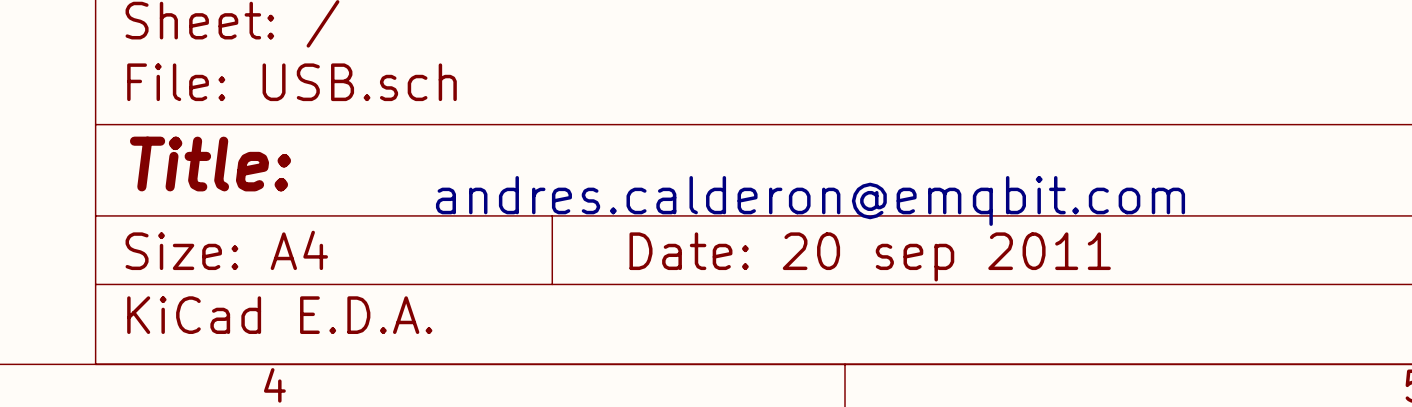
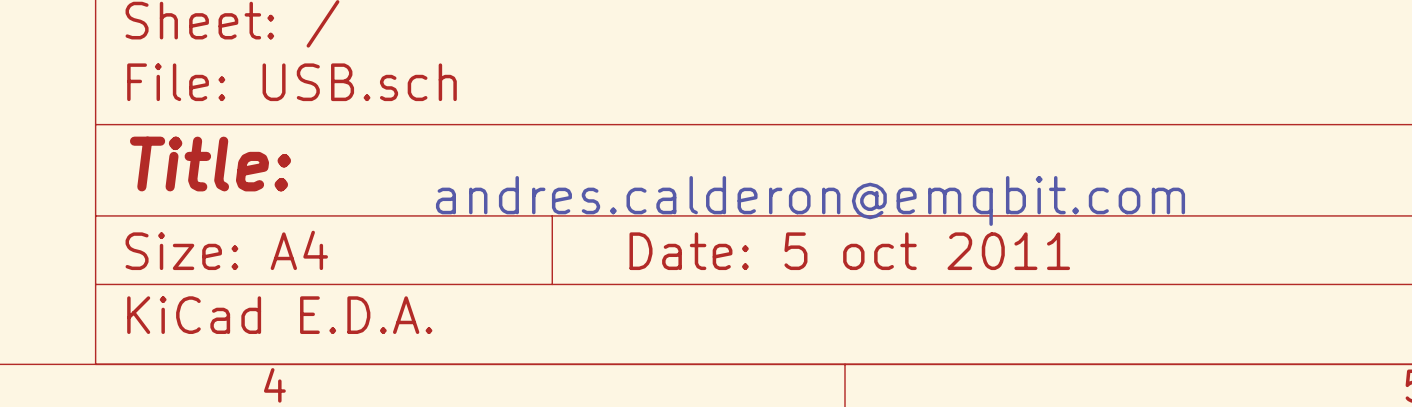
title block: Date: 20 sep 2011 (870, 256) -> Date: 5 oct 2011 (849, 251)

